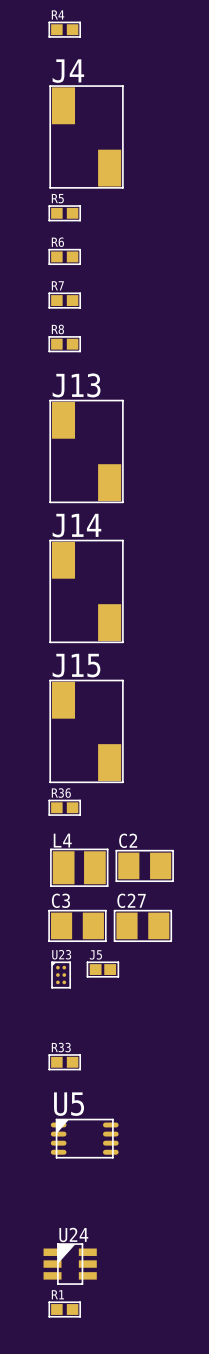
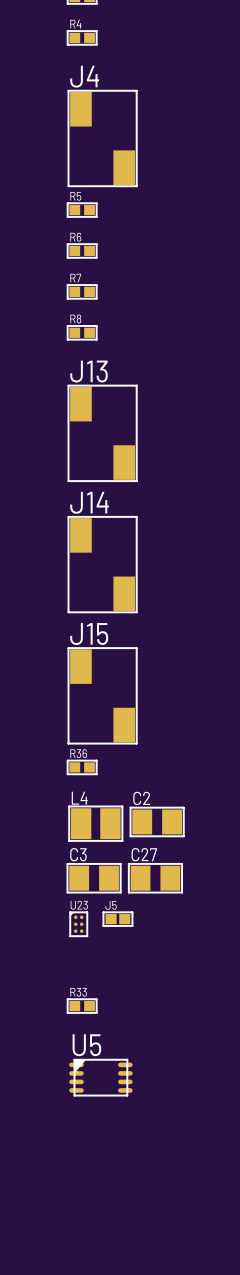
U24: (70, 1264) -> none
R1: (64, 1309) -> none

